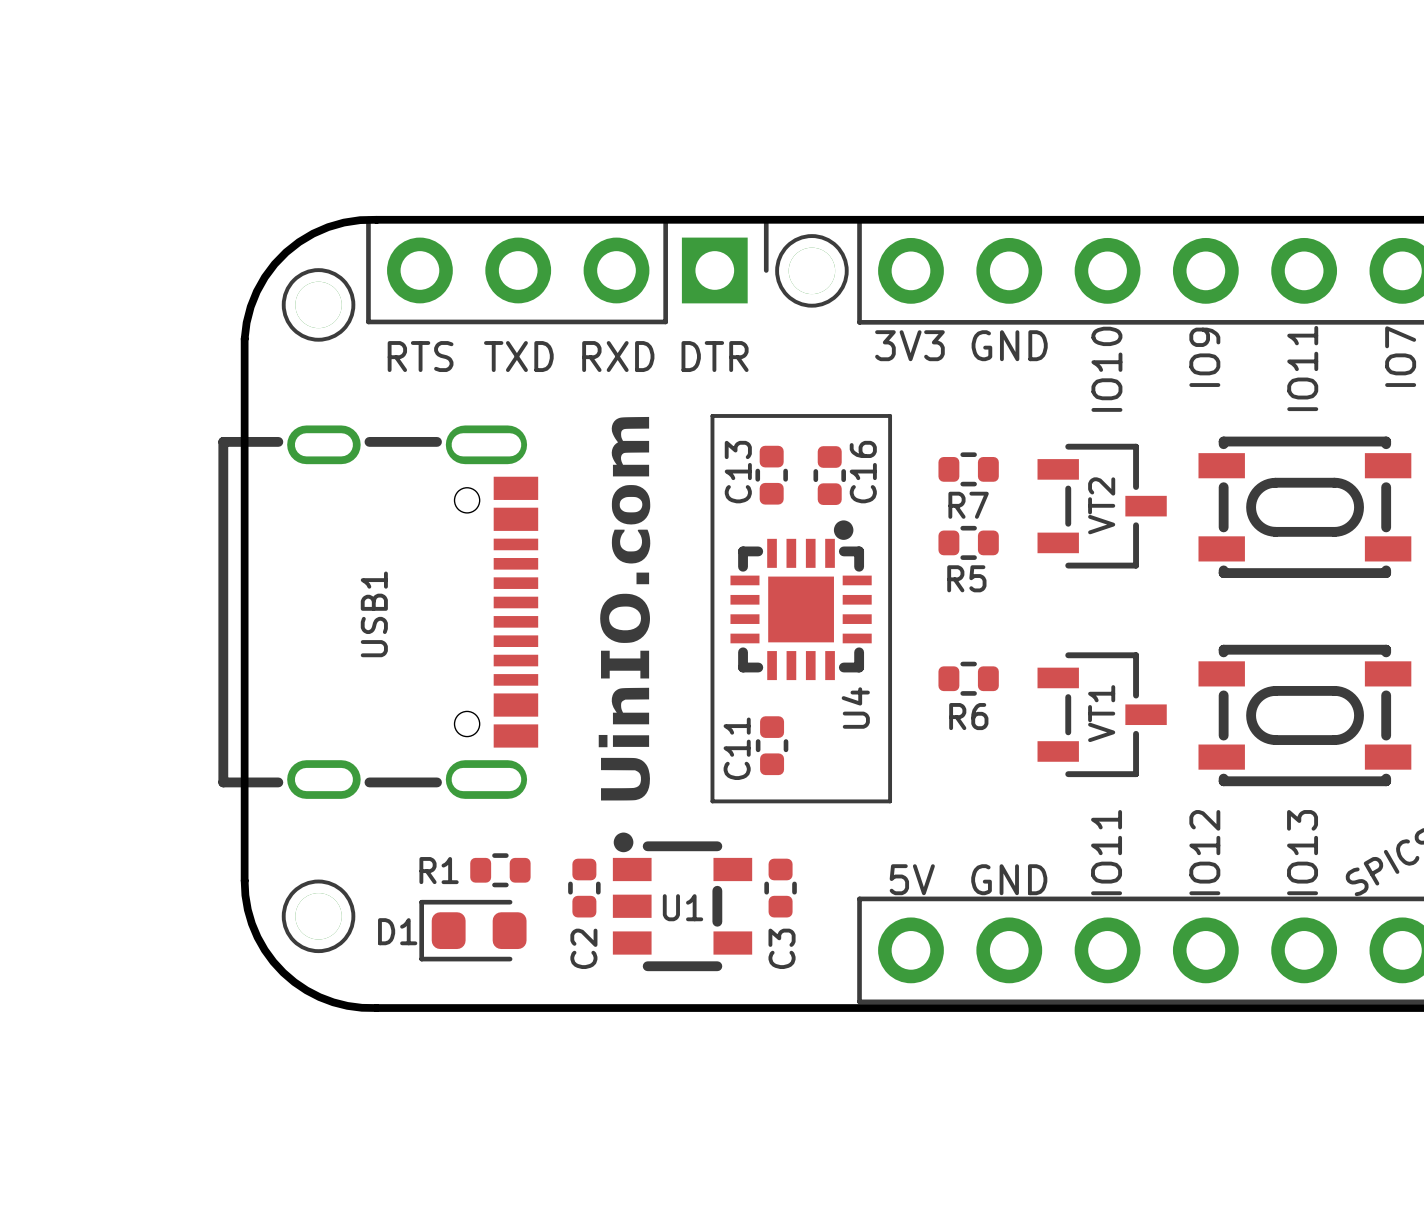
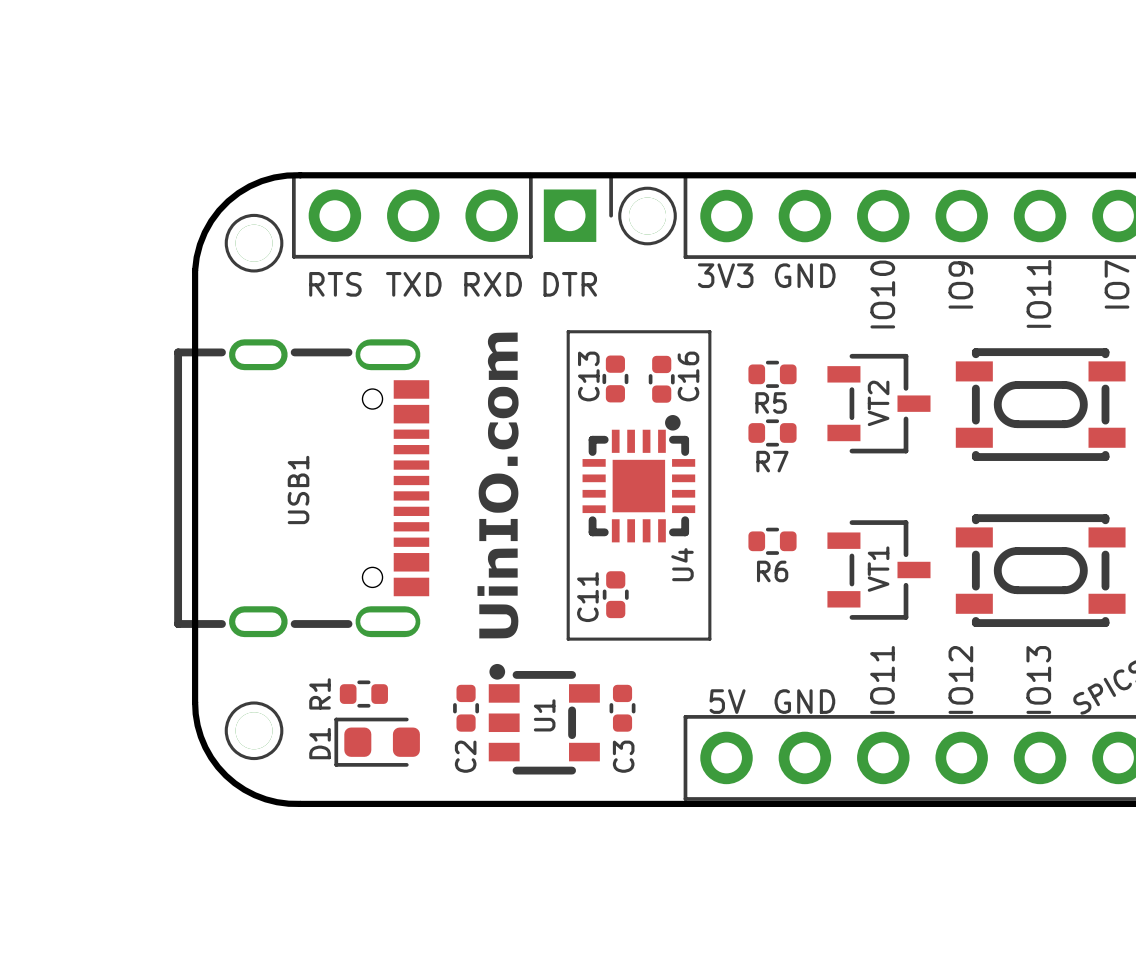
R7 name: R7 (968, 505) -> R5 (771, 402)
R5 name: R5 (966, 578) -> R7 (772, 461)
R1 name rotation: 0° (439, 870) -> 90° counterclockwise (320, 693)
R1 position: (500, 870) -> (363, 694)
U1 name rotation: 0° (683, 907) -> 90° counterclockwise (544, 715)
D1 name rotation: 0° (397, 931) -> 90° counterclockwise (320, 743)

